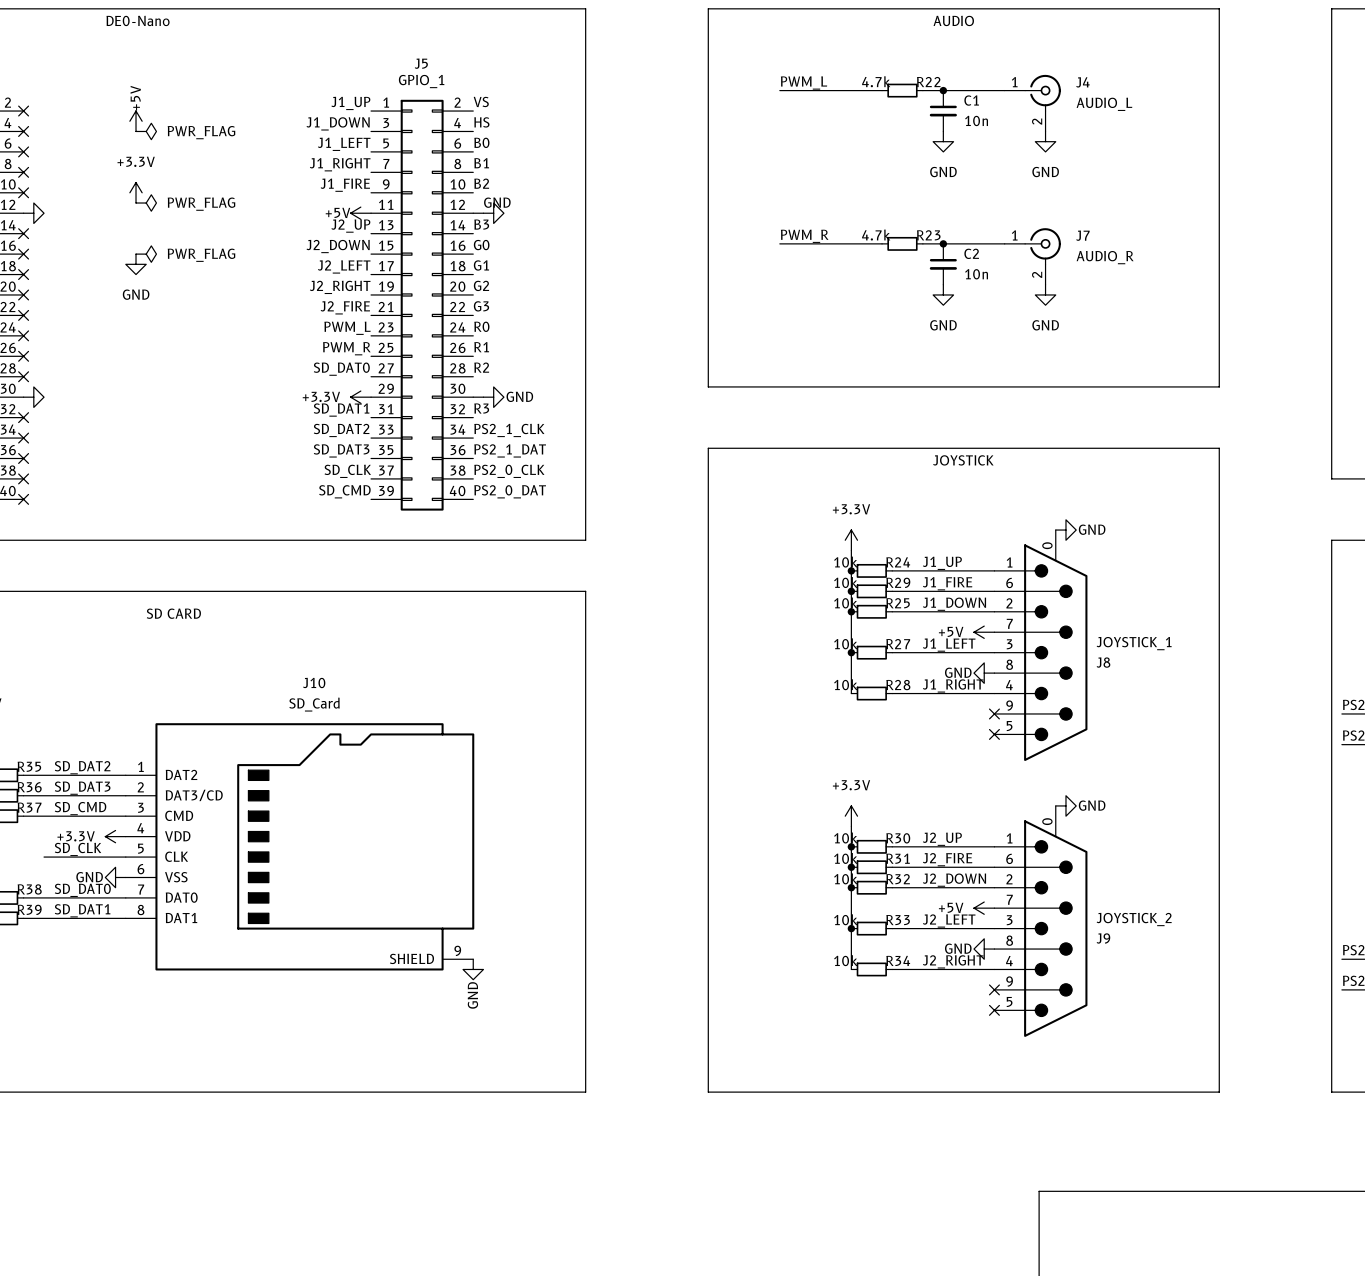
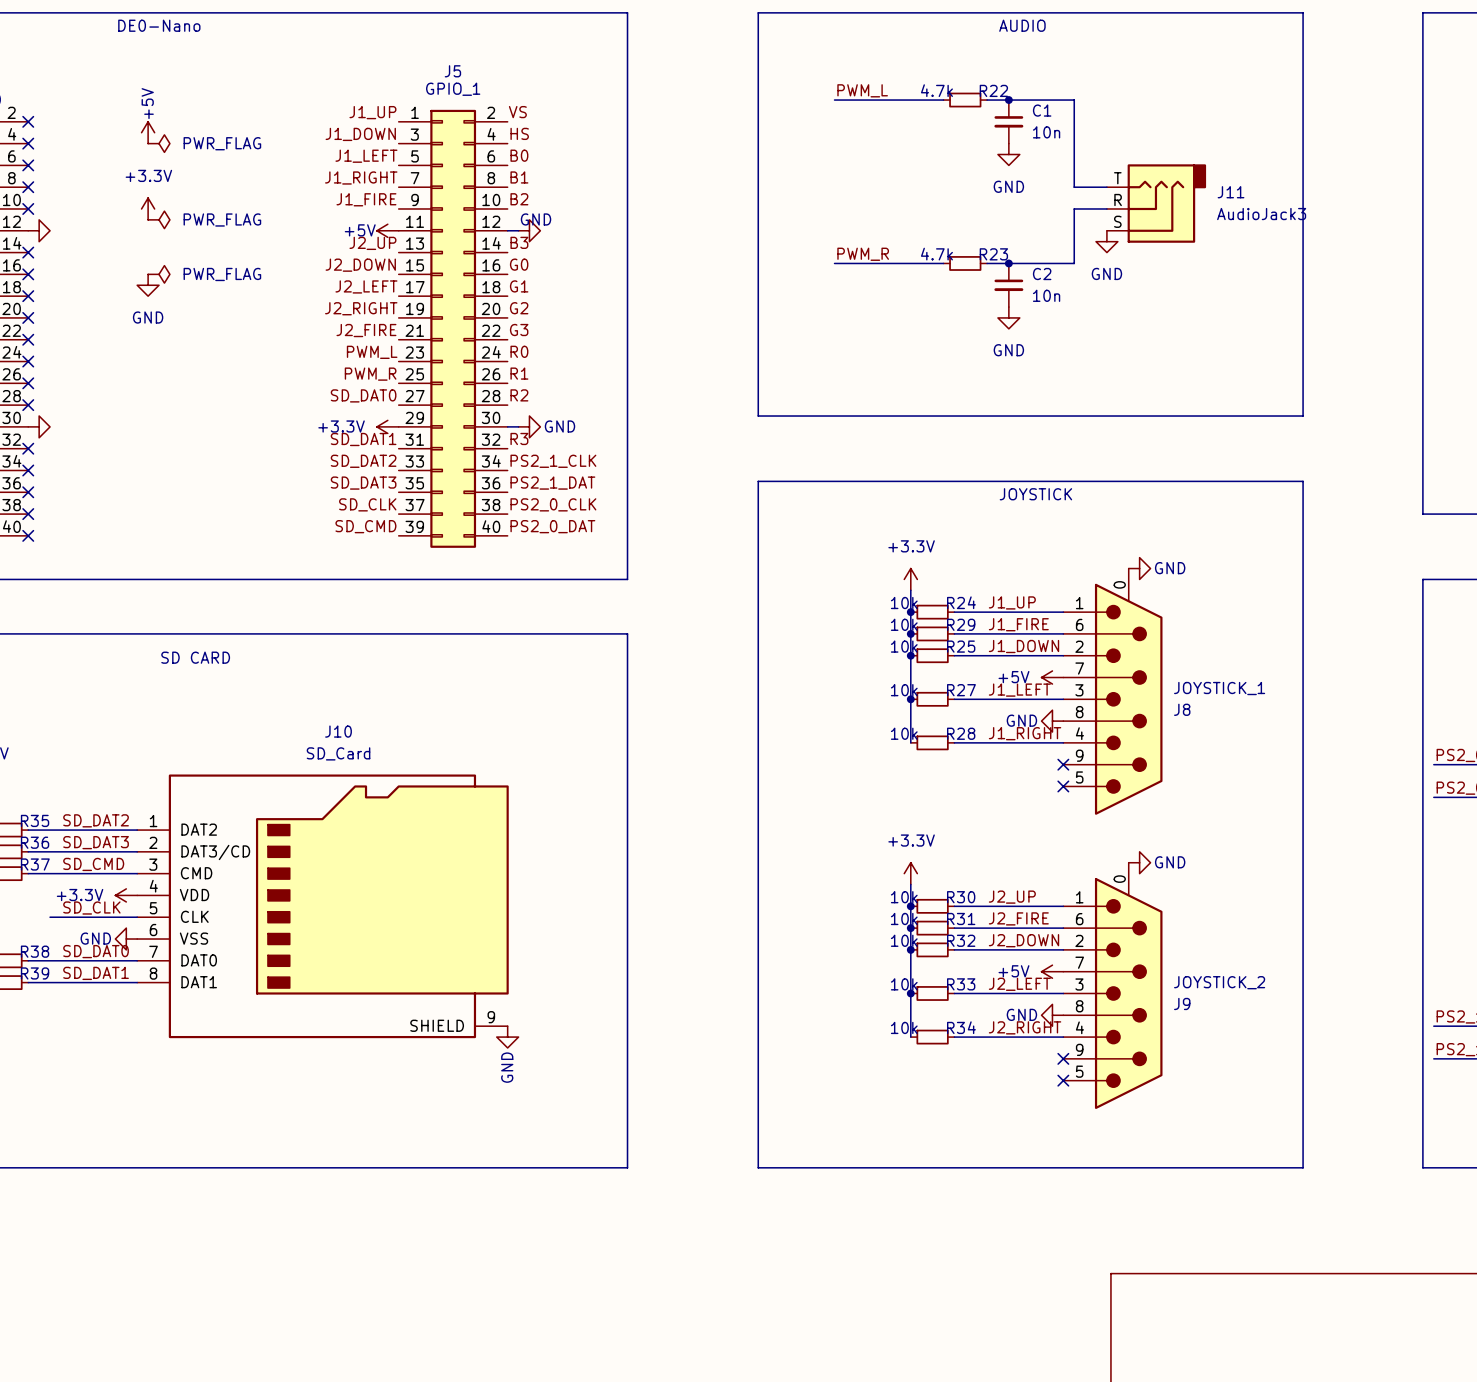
wire: none -> (1074, 100) (1074, 187) (1106, 187)
J4: AUDIO_L (1032, 103) -> none
power symbol: GND (1045, 141) -> none
J11: none -> AudioJack3 (1156, 203)
wire: none -> (1106, 208) (1074, 208) (1074, 263)
power symbol: none -> GND (1106, 241)
J7: AUDIO_R (1032, 256) -> none
power symbol: GND (1045, 294) -> none

